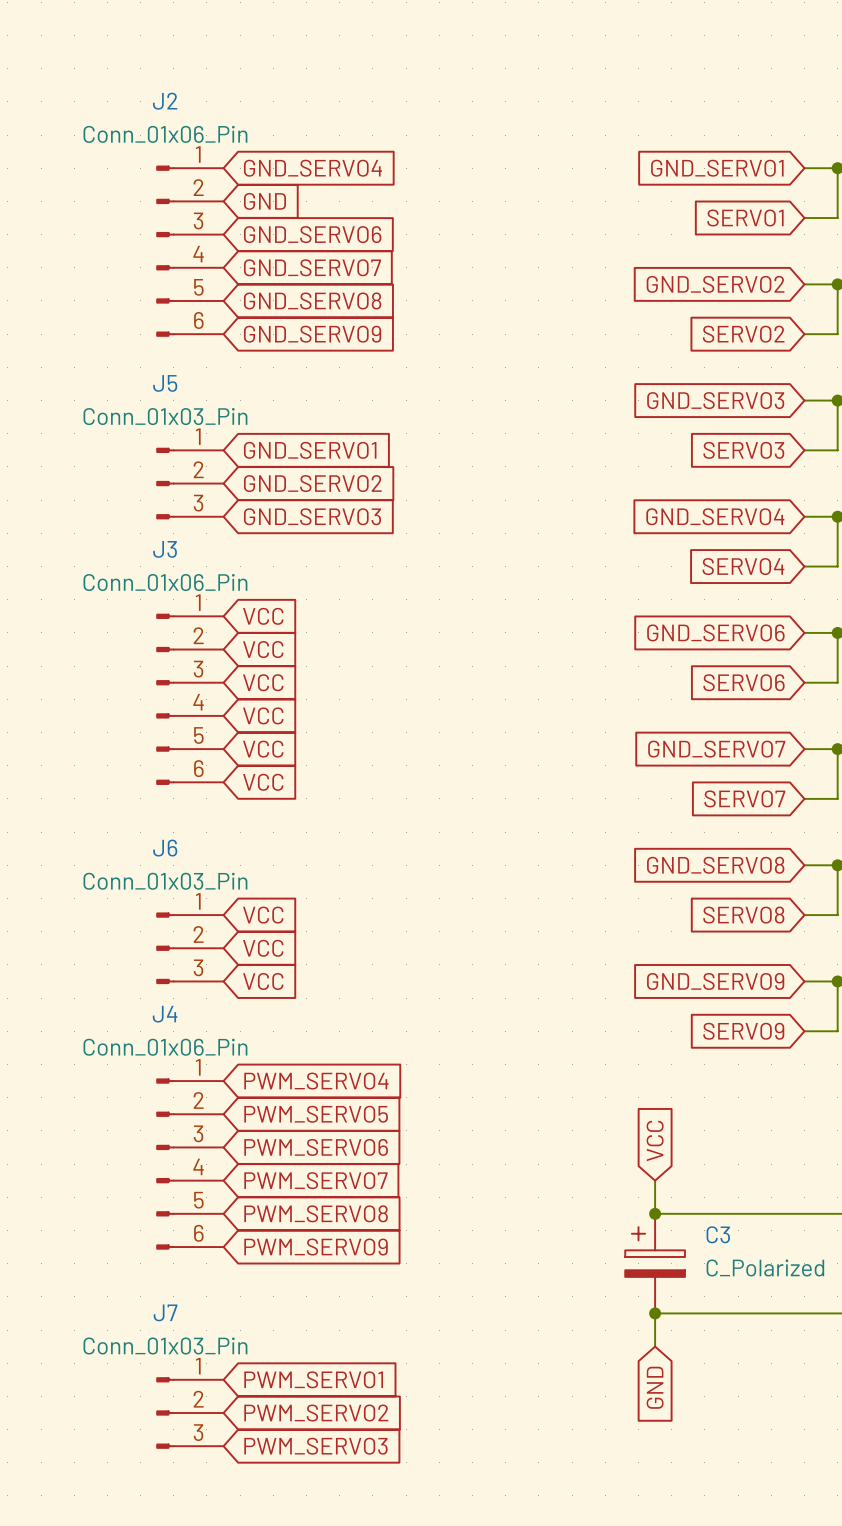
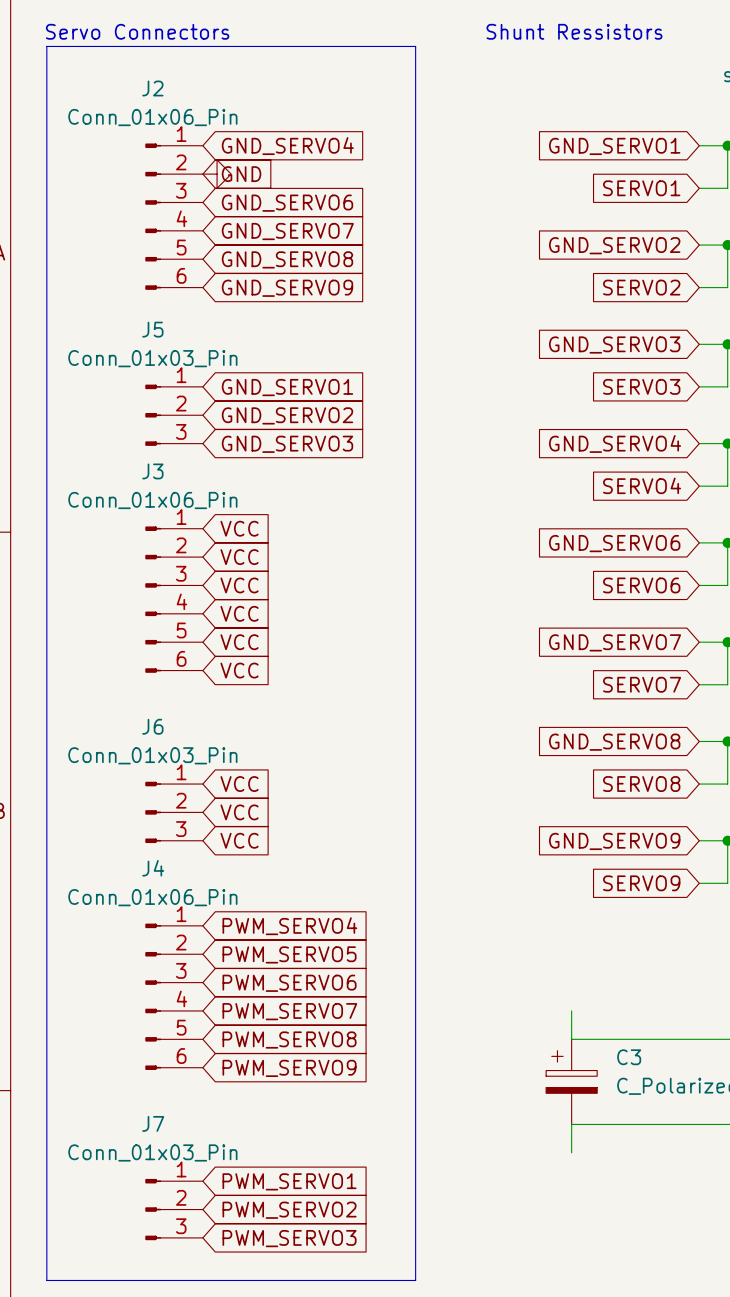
text: none -> Servo Connectors (137, 31)
text: none -> Shunt Ressistors (574, 31)
line: none -> (46, 46) (415, 46) (415, 1280) (46, 1280) (46, 46)
power symbol: none -> (217, 174)
global label: VCC (655, 1140) -> none
junction: (655, 1213) -> none
junction: (655, 1313) -> none
global label: GND (655, 1387) -> none

